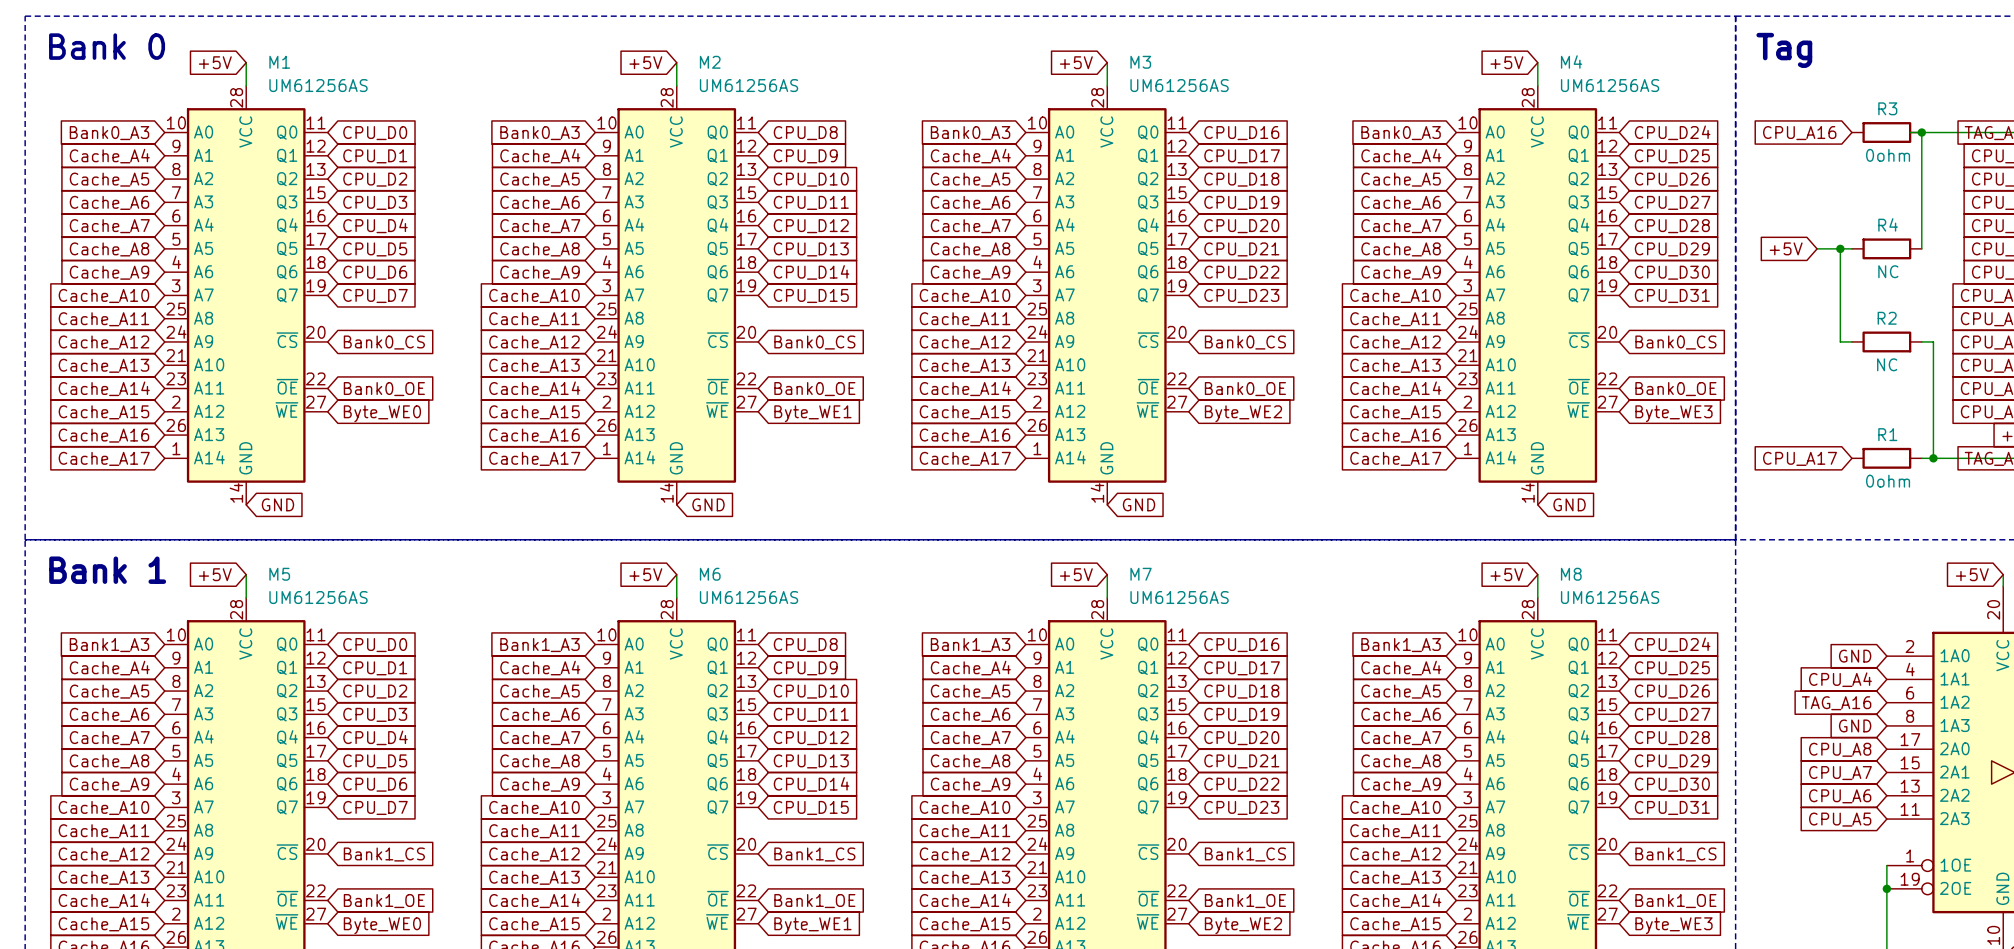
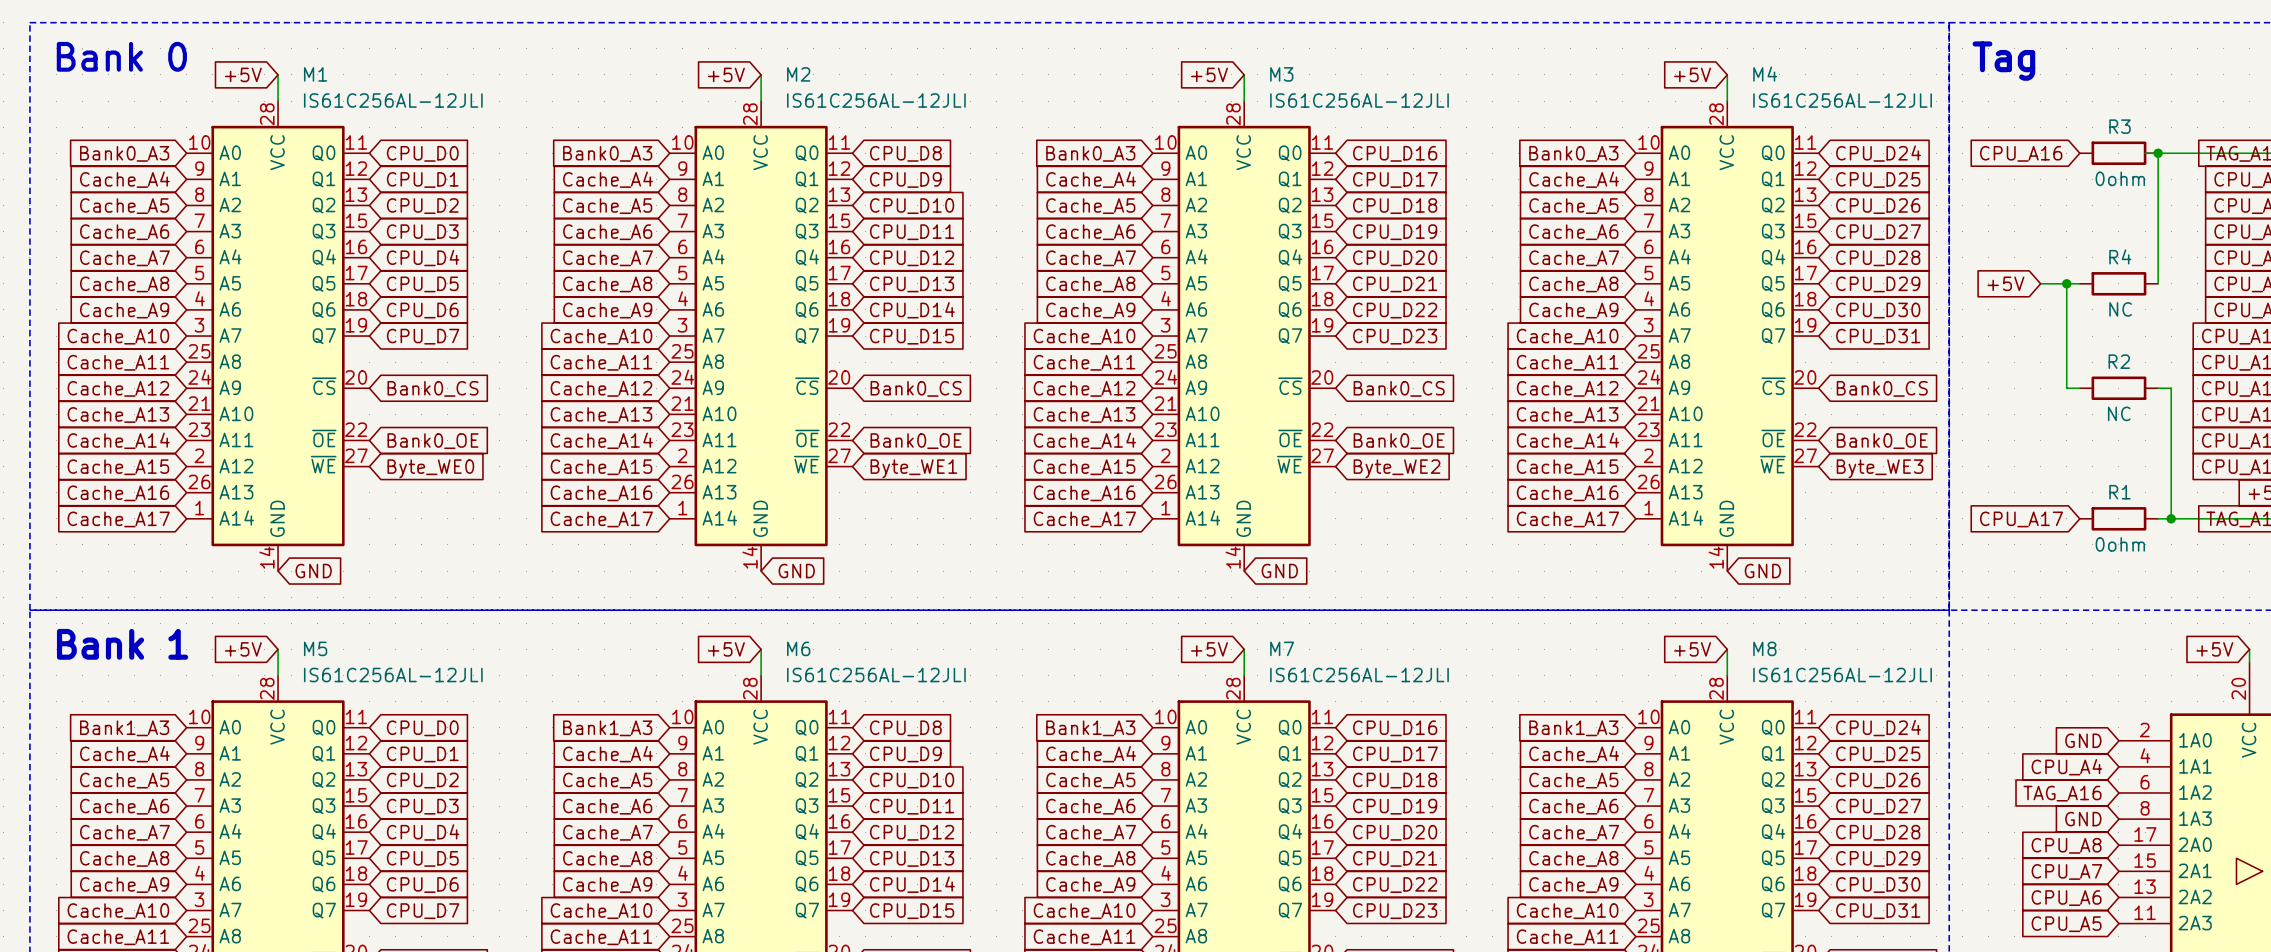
M1 value: UM61256AS (318, 85) -> IS61C256AL-12JLI (393, 100)
M2 value: UM61256AS (749, 85) -> IS61C256AL-12JLI (876, 100)
M3 value: UM61256AS (1179, 85) -> IS61C256AL-12JLI (1359, 100)
M4 value: UM61256AS (1610, 85) -> IS61C256AL-12JLI (1842, 100)
M5 value: UM61256AS (318, 597) -> IS61C256AL-12JLI (393, 675)
M6 value: UM61256AS (749, 597) -> IS61C256AL-12JLI (876, 675)
M7 value: UM61256AS (1179, 597) -> IS61C256AL-12JLI (1359, 675)
M8 value: UM61256AS (1610, 597) -> IS61C256AL-12JLI (1842, 675)

